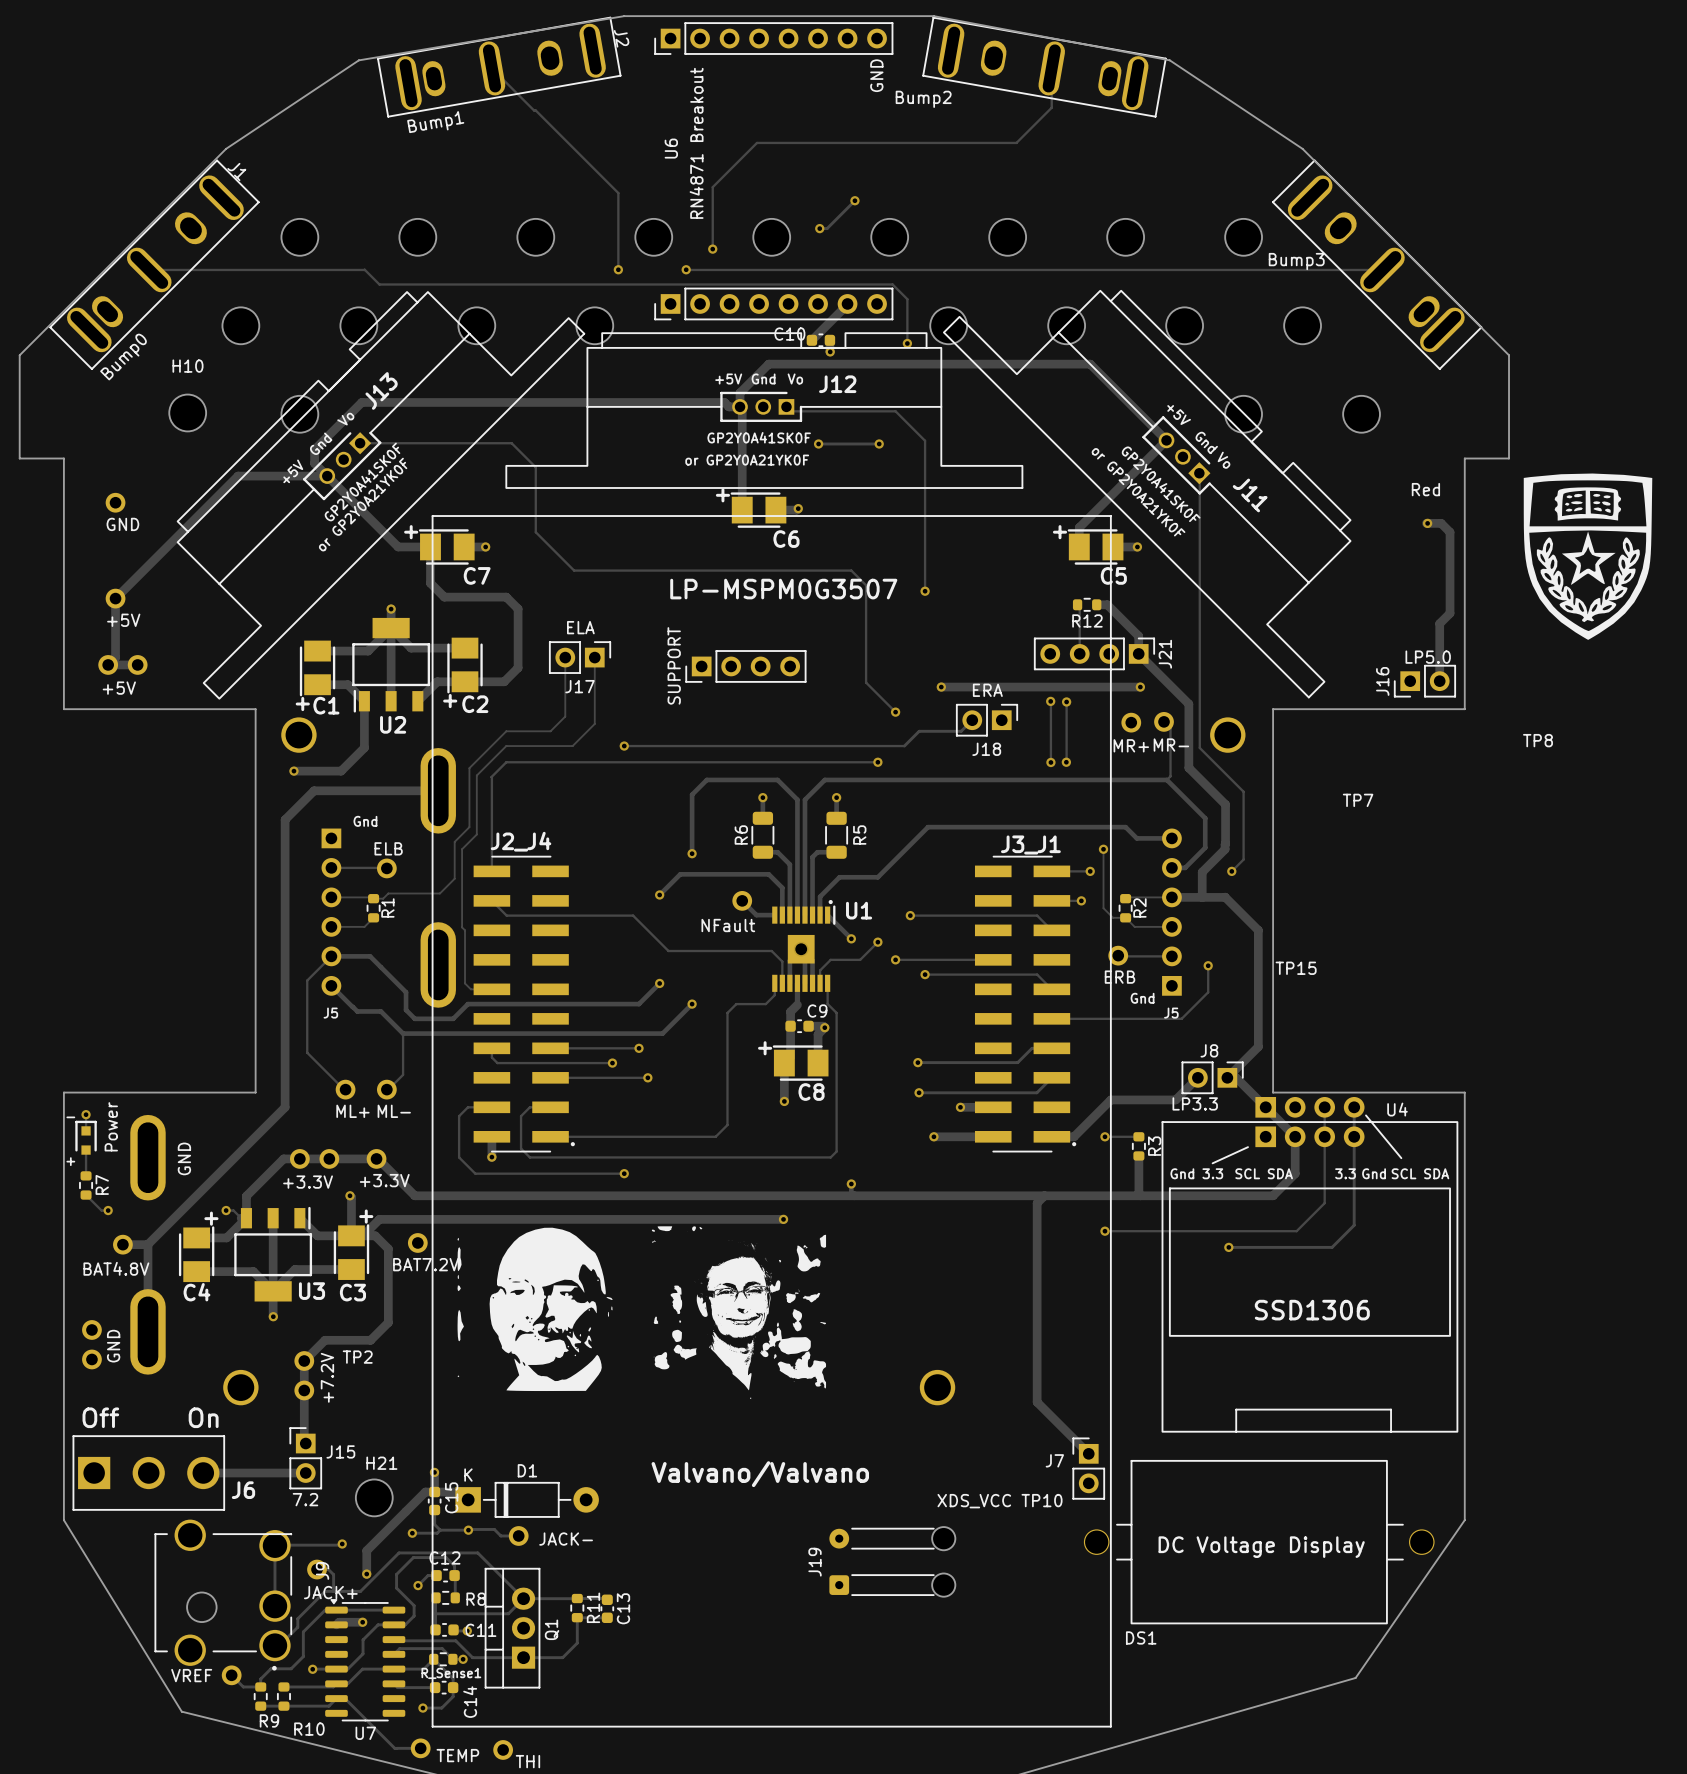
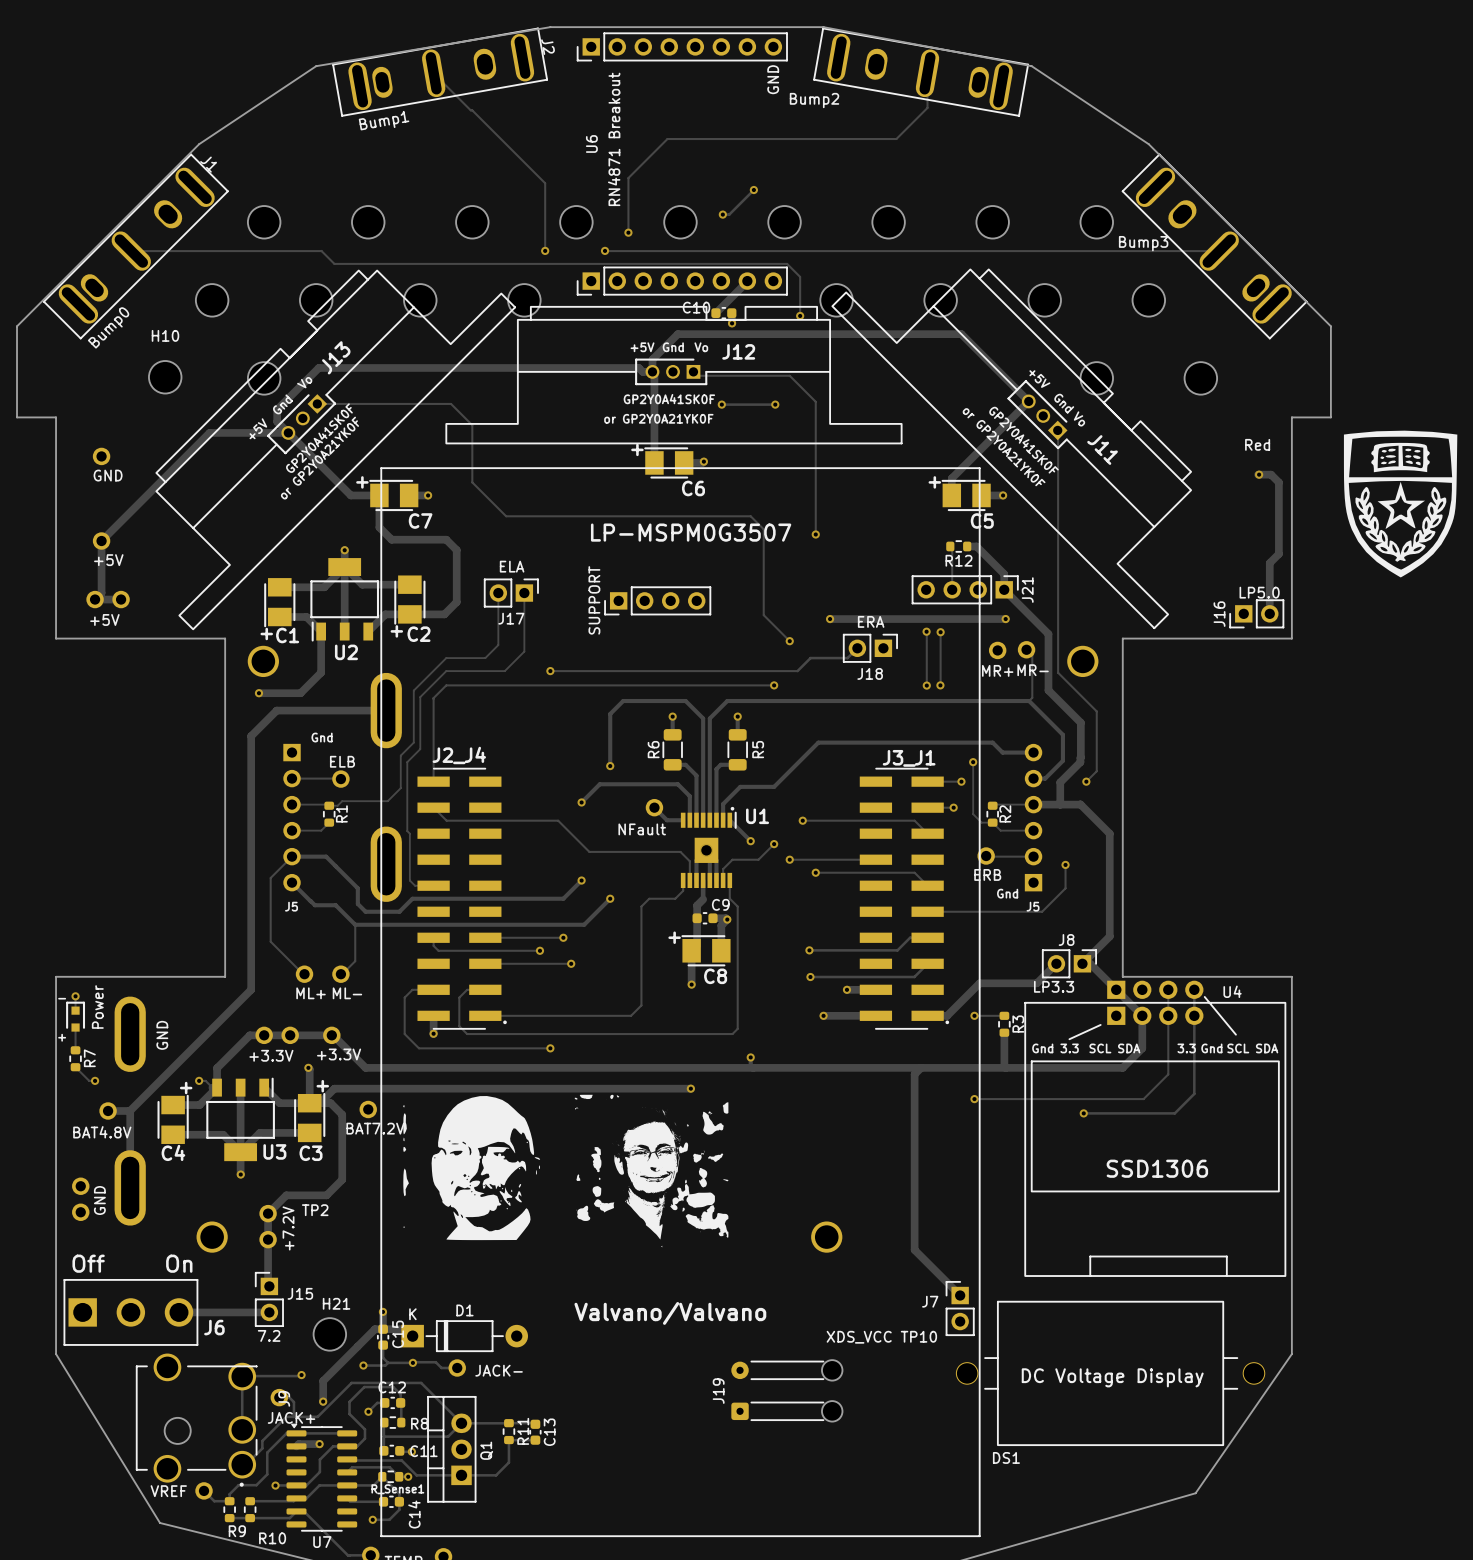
TP8 name: TP8 (1537, 740) -> none
TP7 name: TP7 (1358, 800) -> none
TP15 name: TP15 (1296, 968) -> none

